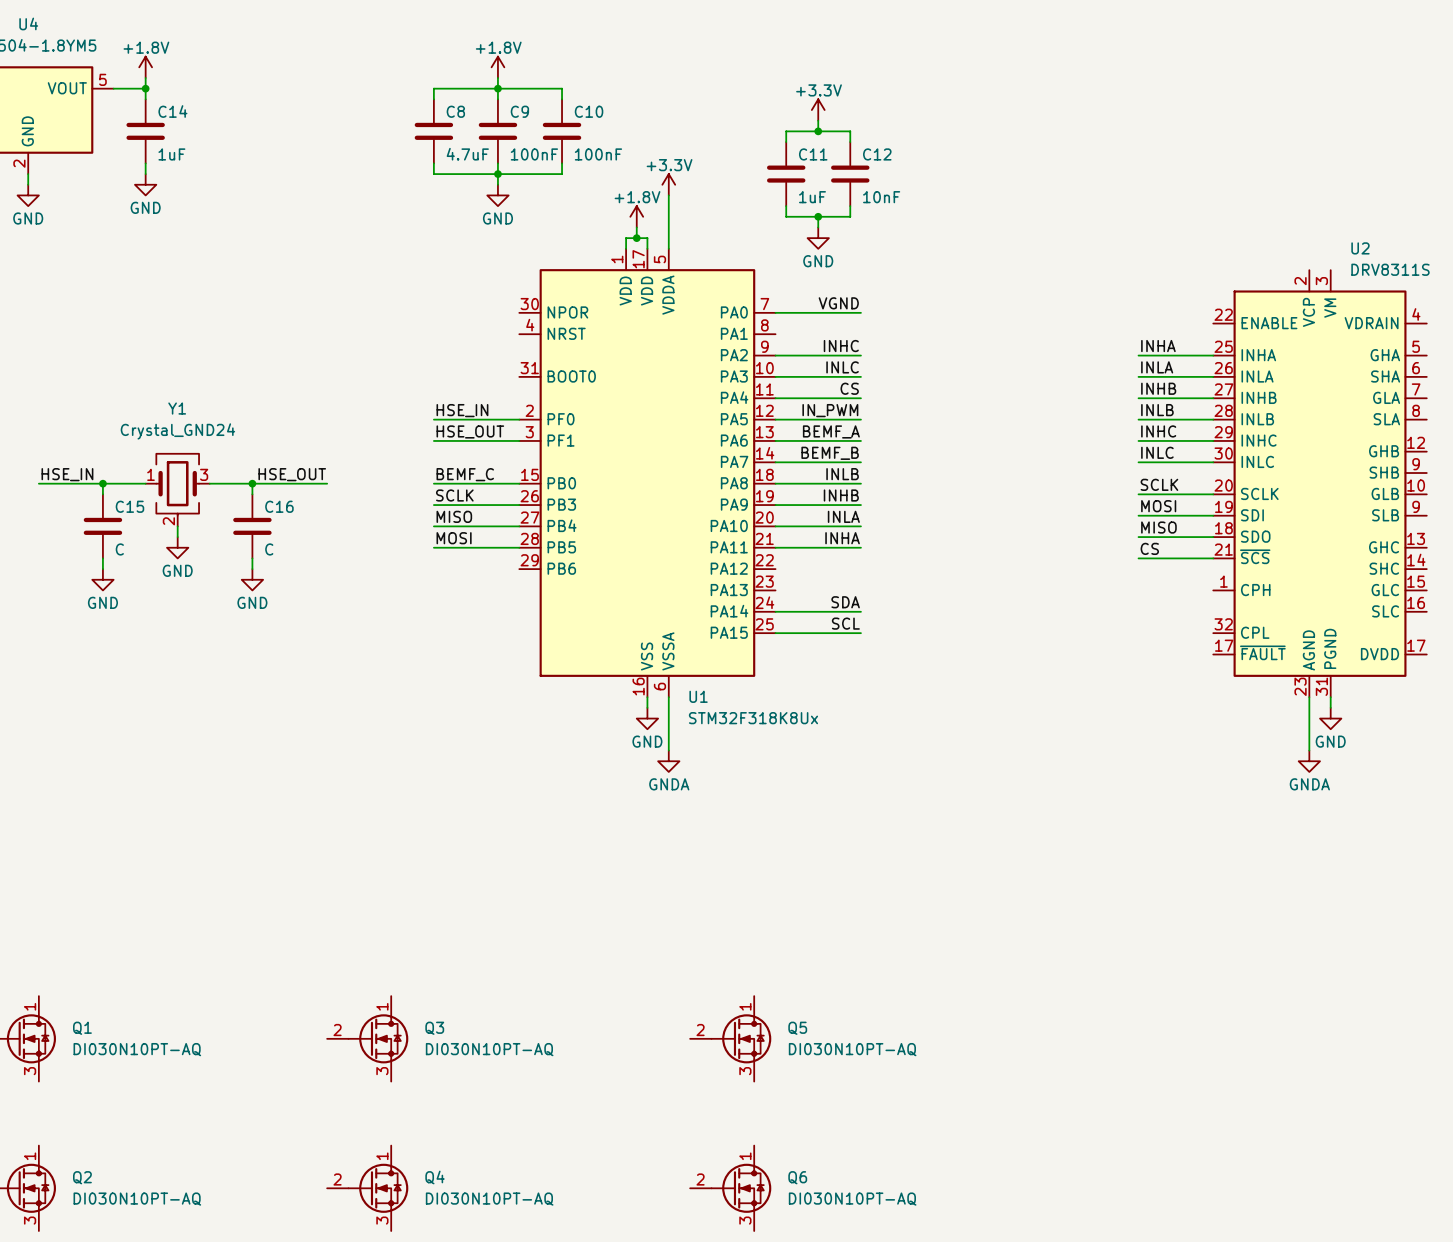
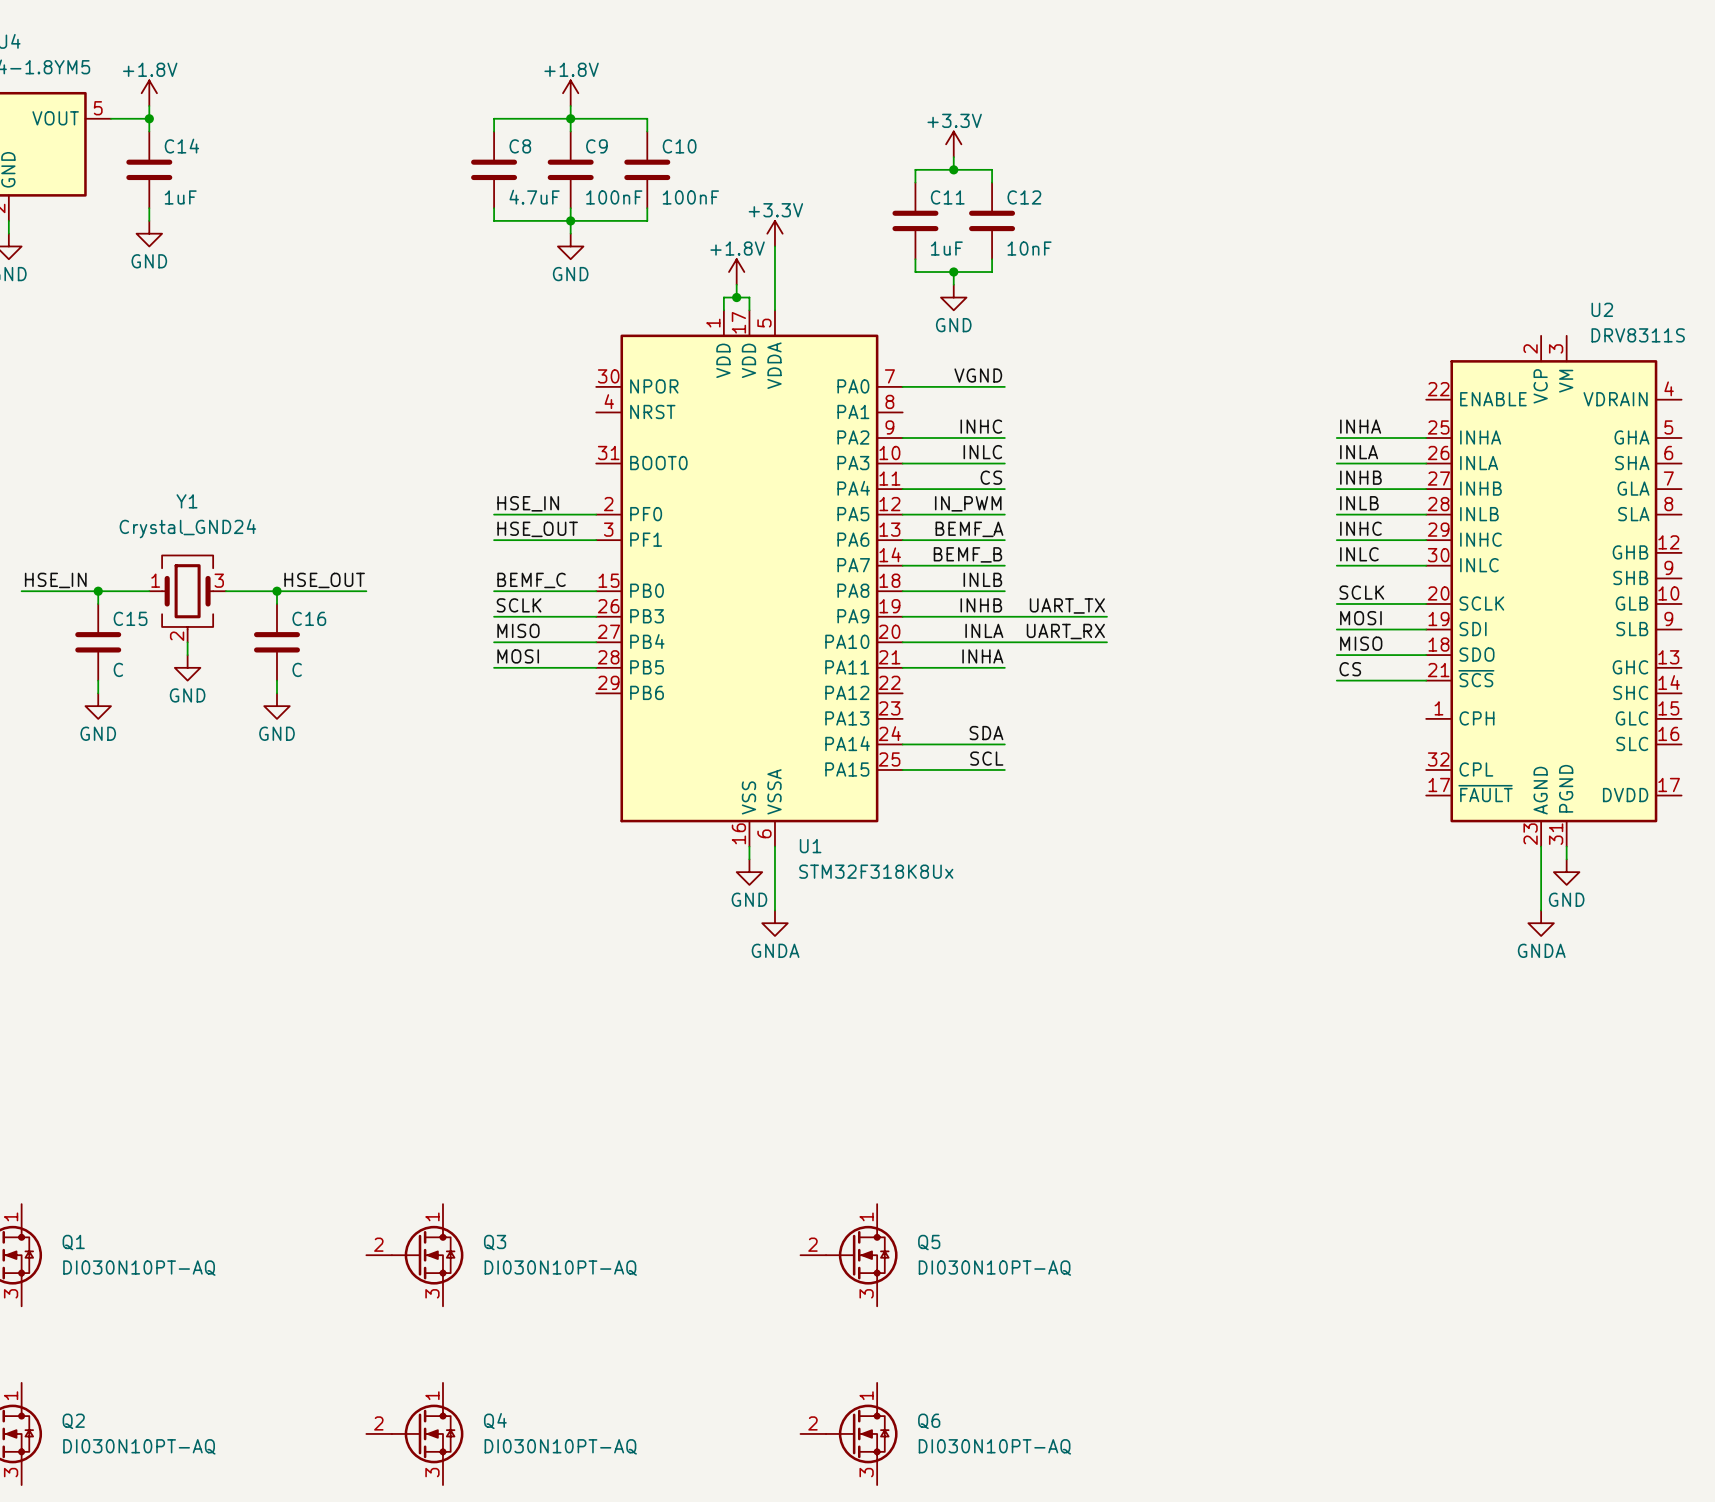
label: none -> UART_TX (1067, 605)
wire: none -> (1004, 616) (1106, 616)
label: none -> UART_RX (1065, 631)
wire: none -> (1004, 642) (1106, 642)

